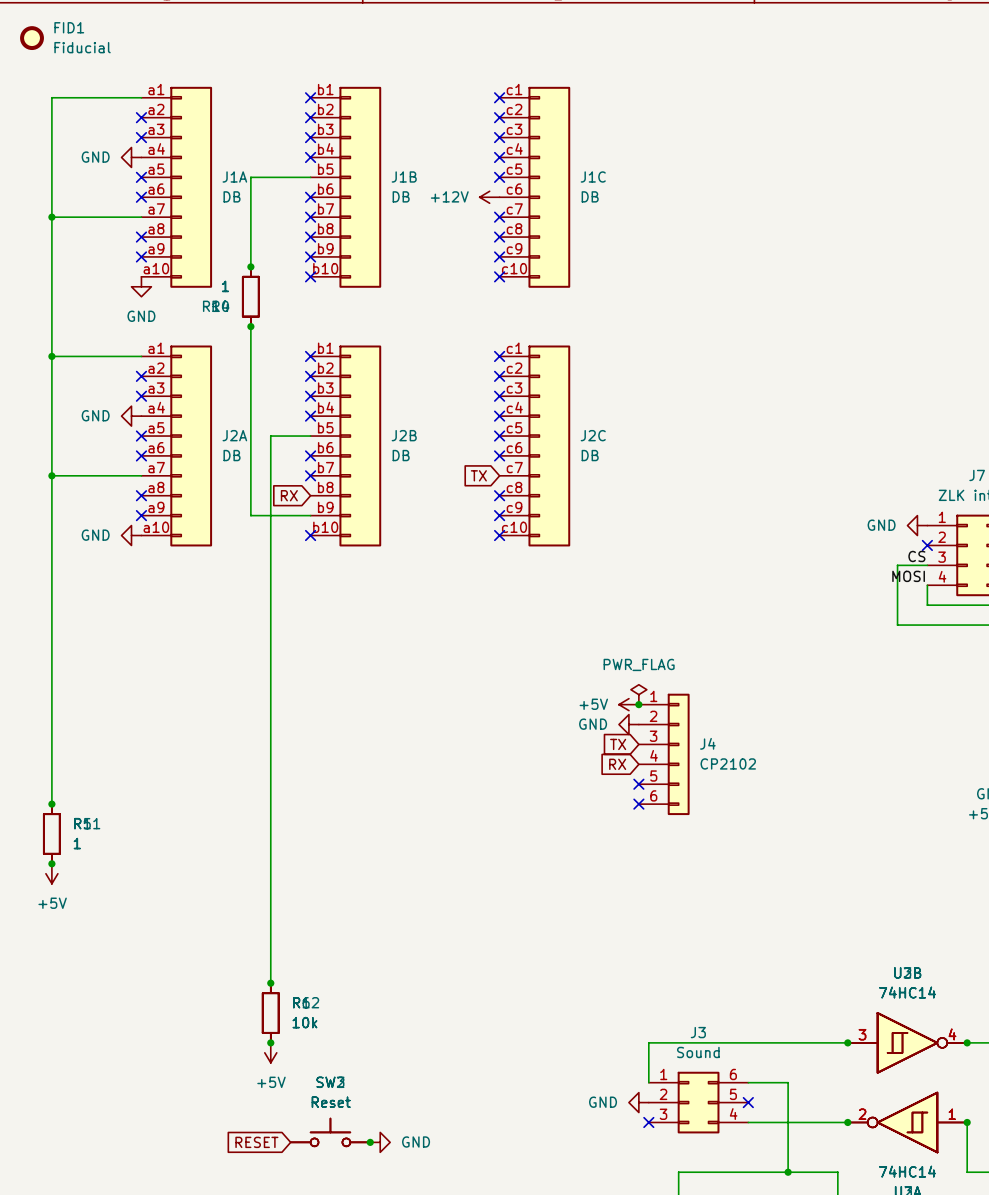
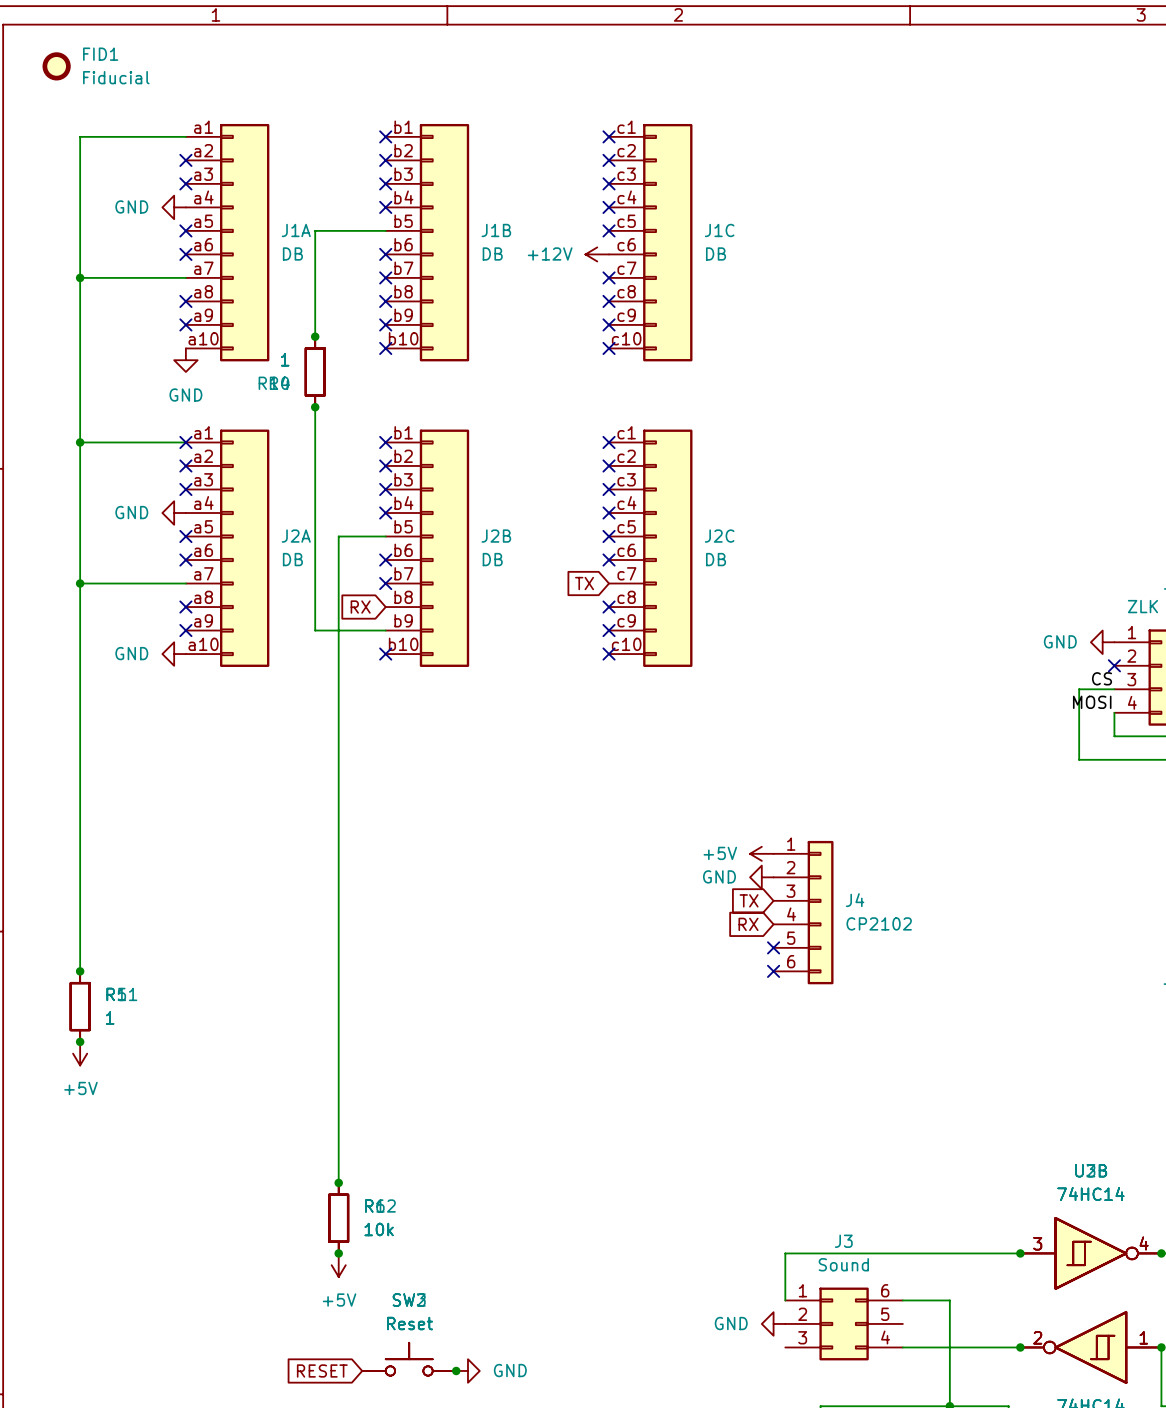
no-connect mark: none -> (185, 442)
power symbol: PWR_FLAG (638, 694) -> none
junction: (638, 704) -> none
no-connect mark: (748, 1102) -> none
no-connect mark: (648, 1122) -> none

